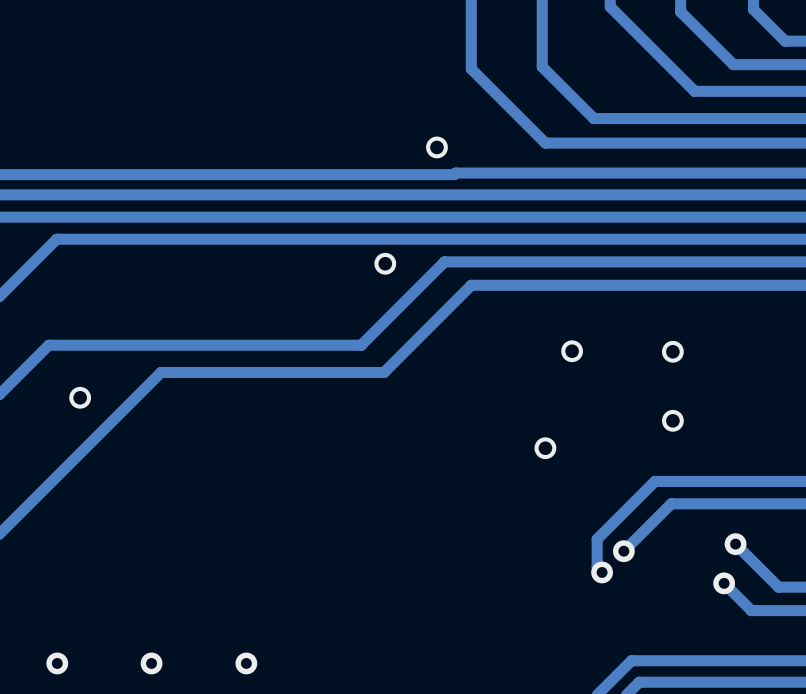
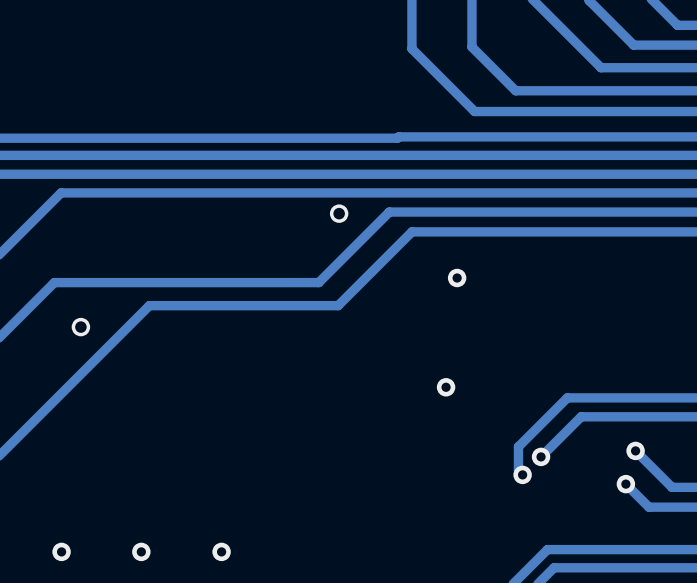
via: (436, 147) -> none
via: none -> (457, 278)
via: (572, 351) -> none
via: (672, 351) -> none
via: (672, 420) -> none
via: (545, 448) -> none
via: none -> (446, 387)

